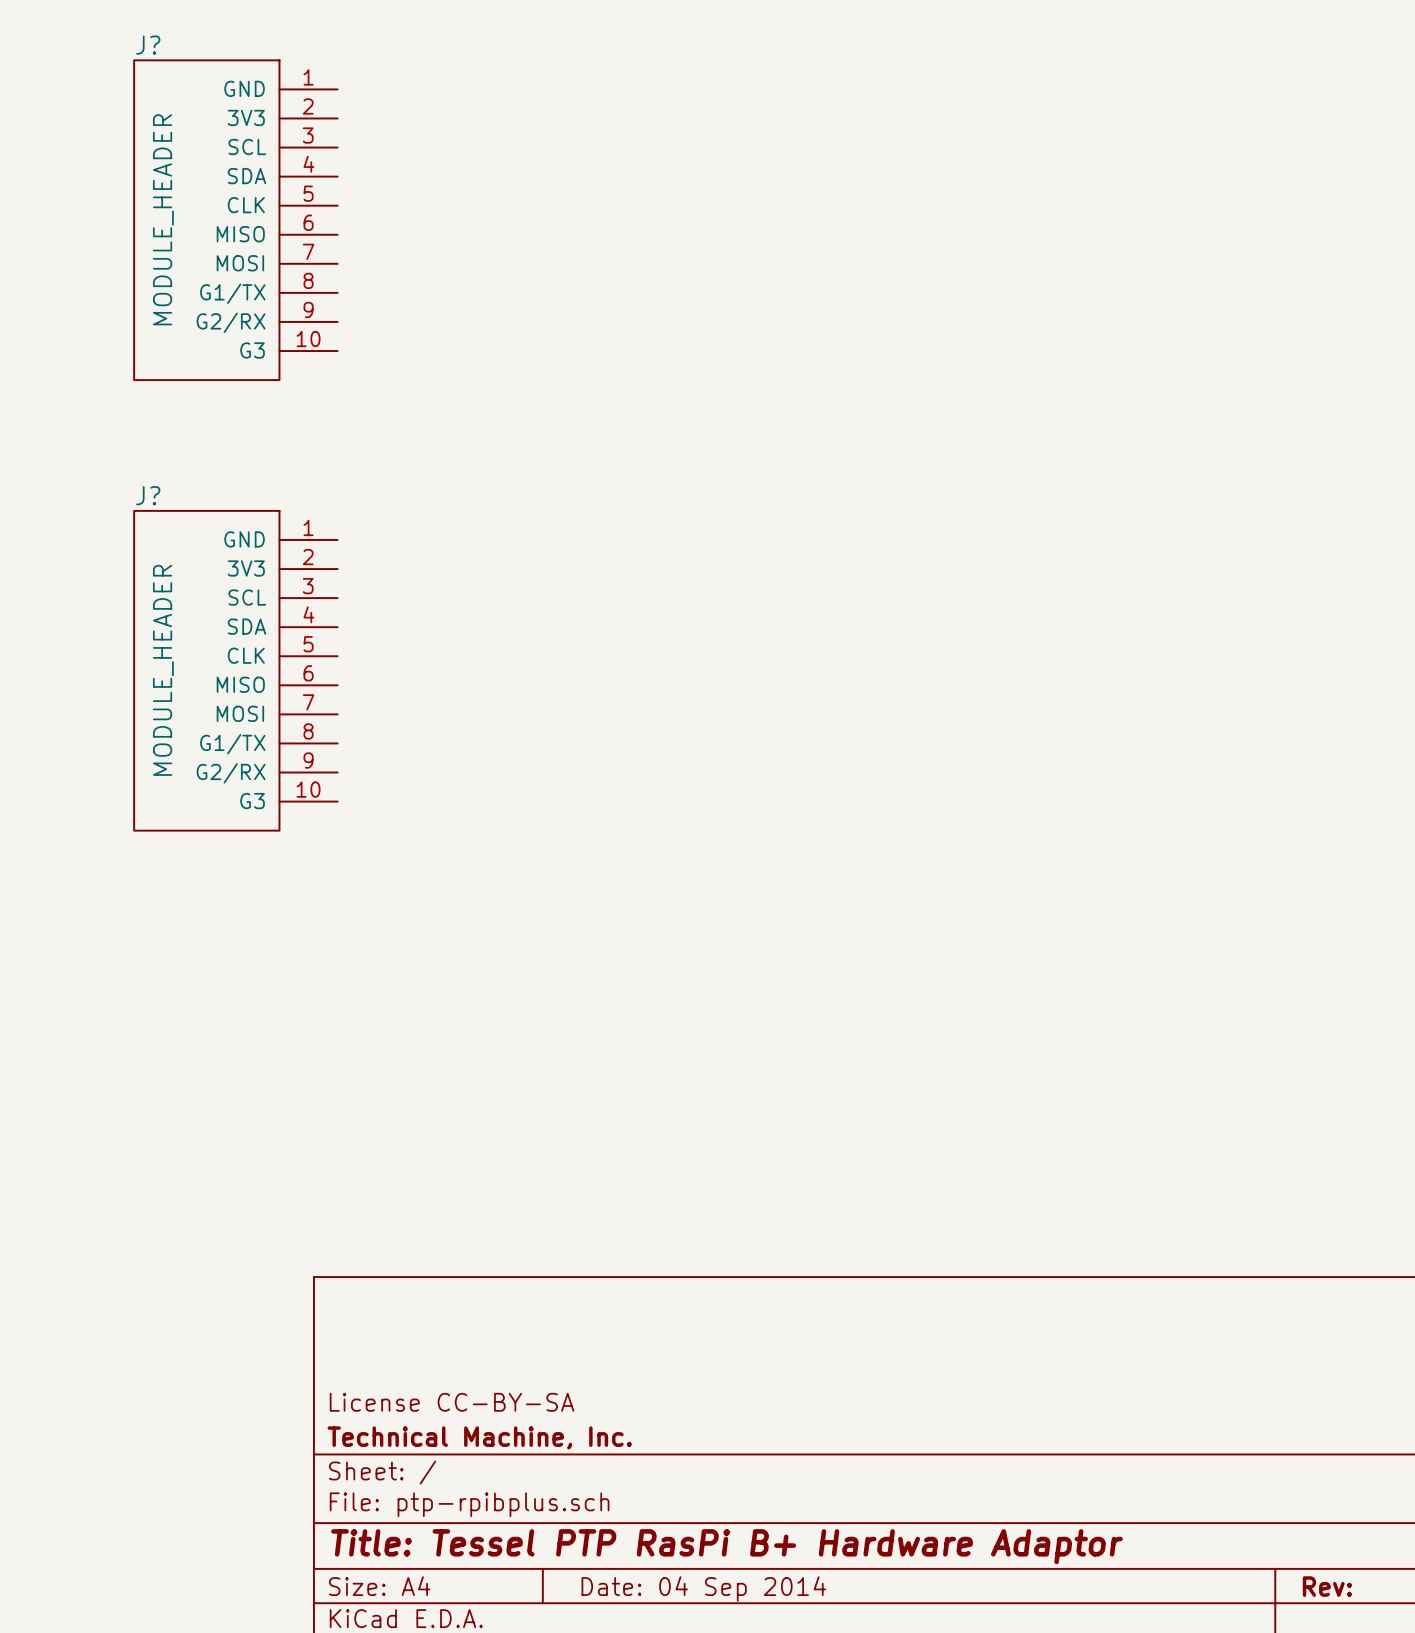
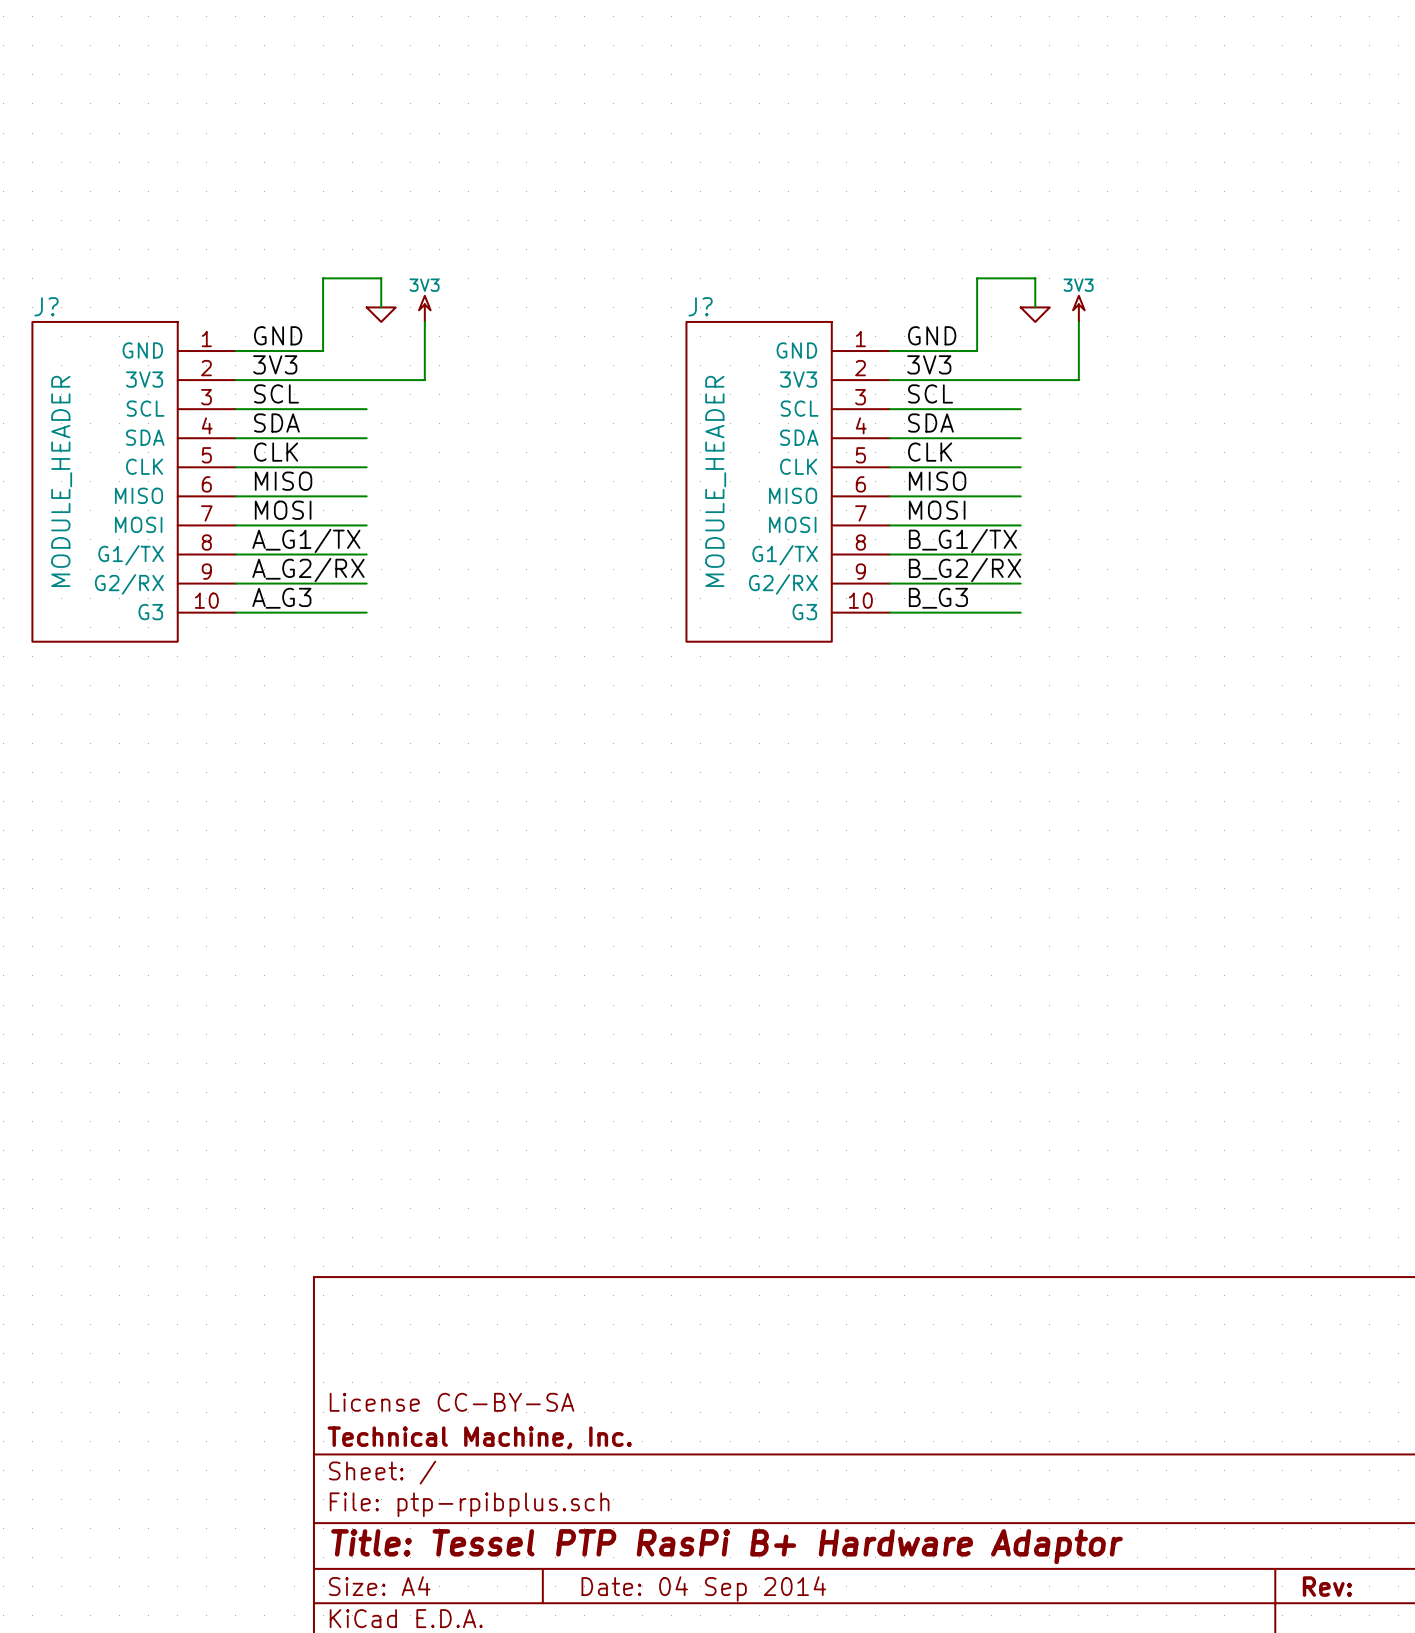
J?: MODULE_HEADER (235, 220) -> none
wire: none -> (381, 307) (381, 278) (323, 278) (323, 351) (235, 351)
wire: none -> (1035, 307) (1035, 278) (977, 278) (977, 351) (889, 351)
power symbol: none -> 3V3 (424, 308)
power symbol: none -> 3V3 (1078, 308)
power symbol: none -> (381, 314)
power symbol: none -> (1035, 314)
wire: none -> (424, 321) (424, 380) (235, 380)
wire: none -> (1078, 321) (1078, 380) (889, 380)
label: none -> GND (278, 335)
label: none -> GND (932, 335)
label: none -> 3V3 (275, 364)
label: none -> 3V3 (929, 364)
label: none -> SCL (276, 393)
label: none -> SCL (930, 393)
wire: none -> (235, 409) (366, 409)
wire: none -> (889, 409) (1020, 409)
label: none -> SDA (276, 423)
label: none -> SDA (930, 423)
wire: none -> (235, 438) (366, 438)
wire: none -> (889, 438) (1020, 438)
label: none -> CLK (276, 452)
label: none -> CLK (930, 452)
wire: none -> (235, 467) (366, 467)
wire: none -> (889, 467) (1020, 467)
J?: none -> MODULE_HEADER (134, 481)
label: none -> MISO (283, 481)
J?: none -> MODULE_HEADER (788, 481)
label: none -> MISO (937, 481)
wire: none -> (235, 496) (366, 496)
wire: none -> (889, 496) (1020, 496)
label: none -> MOSI (283, 510)
label: none -> MOSI (937, 510)
wire: none -> (235, 525) (366, 525)
wire: none -> (889, 525) (1020, 525)
label: none -> A_G1/TX (306, 540)
label: none -> B_G1/TX (962, 540)
wire: none -> (235, 554) (366, 554)
wire: none -> (889, 554) (1020, 554)
label: none -> A_G2/RX (308, 570)
label: none -> B_G2/RX (964, 570)
wire: none -> (235, 583) (366, 583)
wire: none -> (889, 583) (1020, 583)
label: none -> A_G3 (281, 598)
label: none -> B_G3 (938, 598)
wire: none -> (235, 612) (366, 612)
wire: none -> (889, 612) (1020, 612)
J?: MODULE_HEADER (235, 670) -> none

